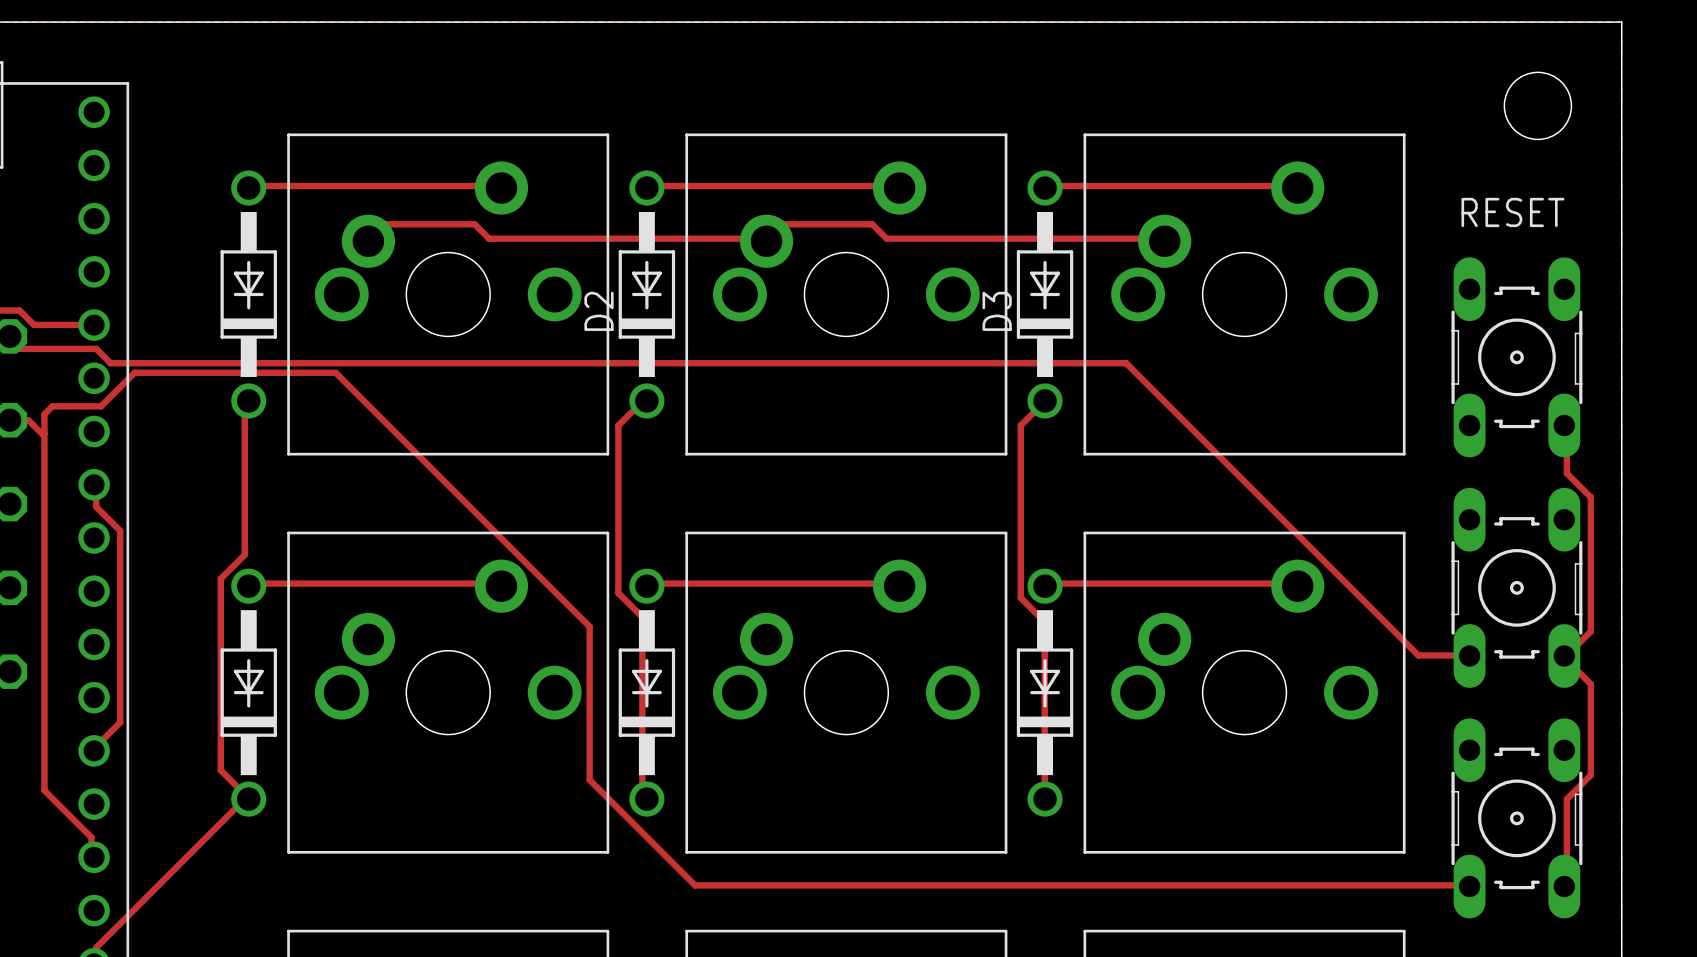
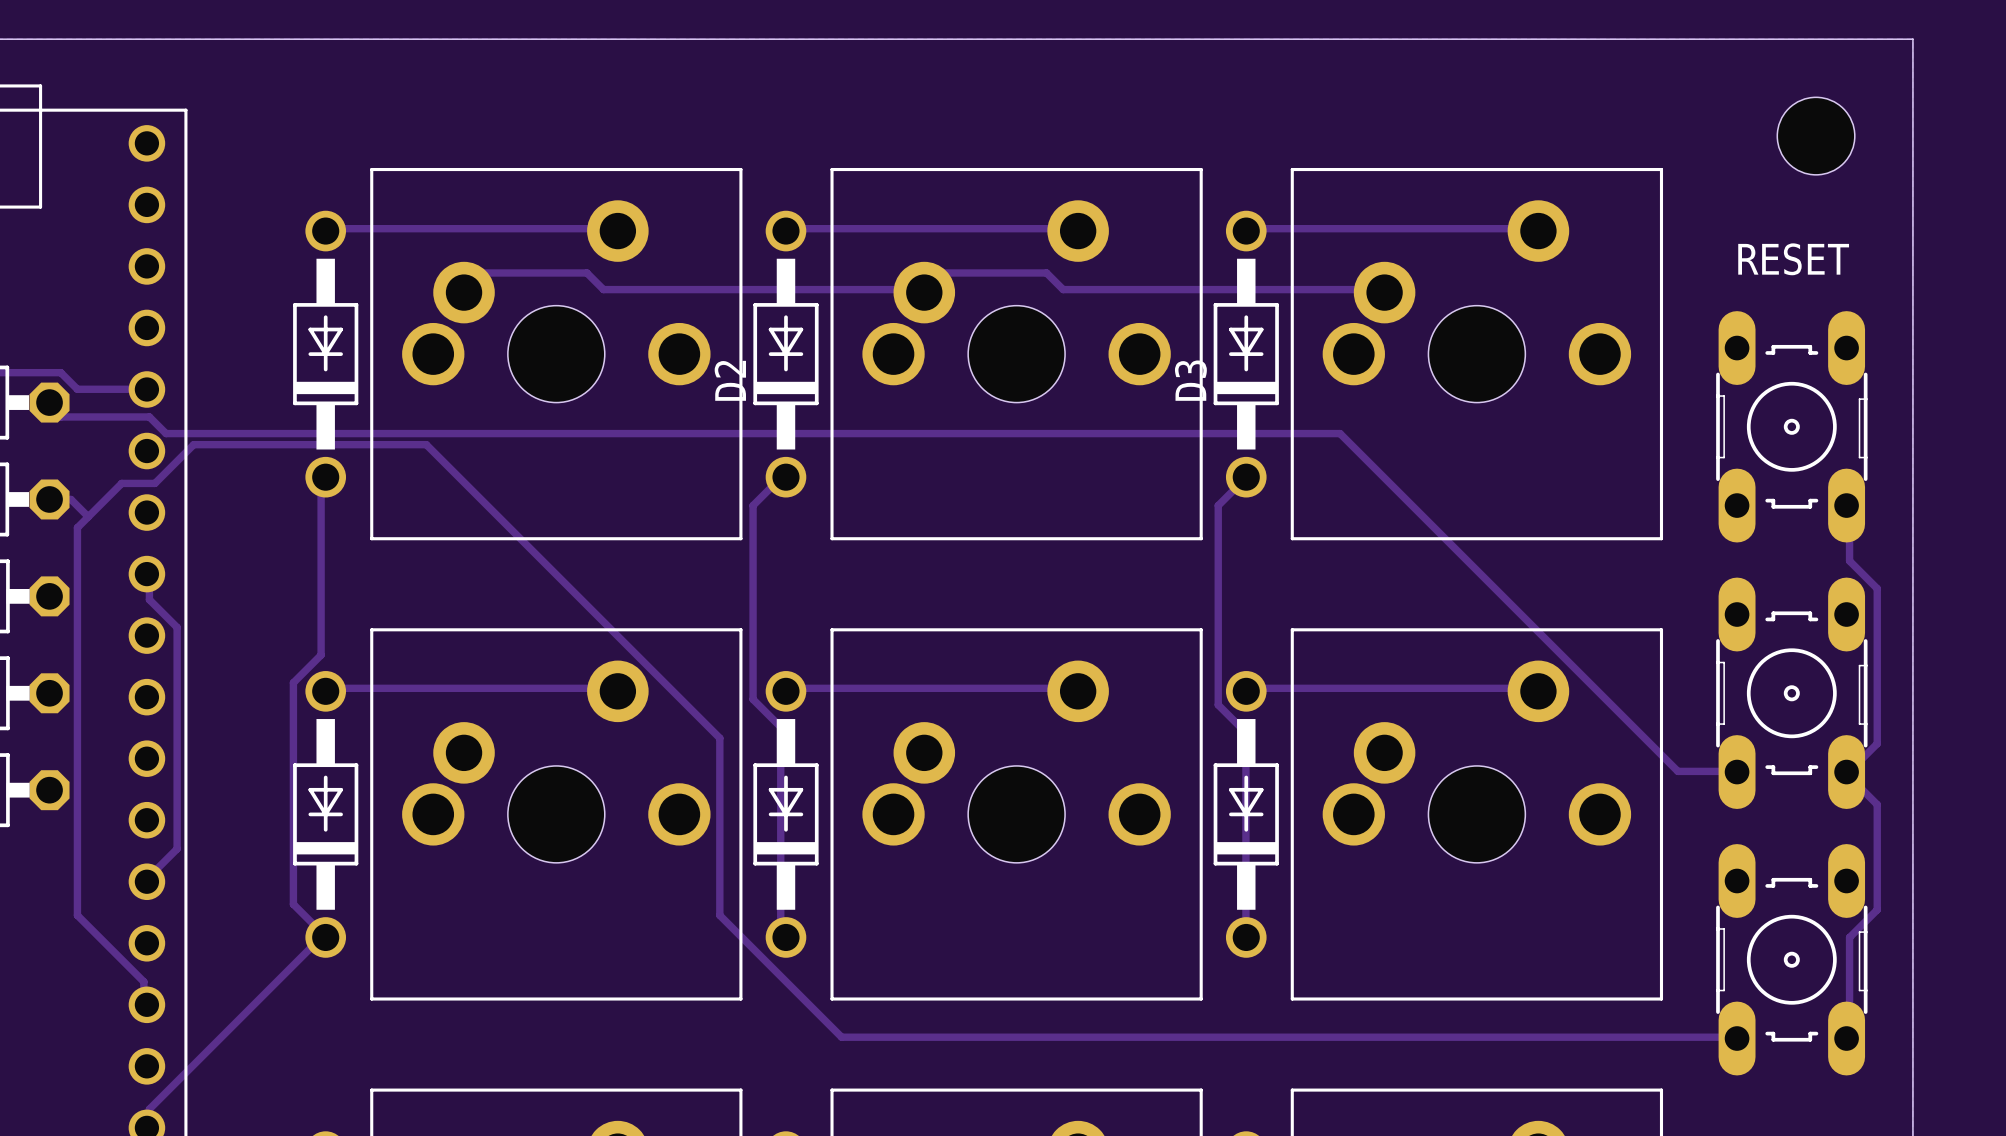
track: (72, 406) (52, 406) (44, 414) (44, 790) -> (88, 516) (77, 527) (77, 915) (89, 927)
track: none -> (121, 483) (89, 515)

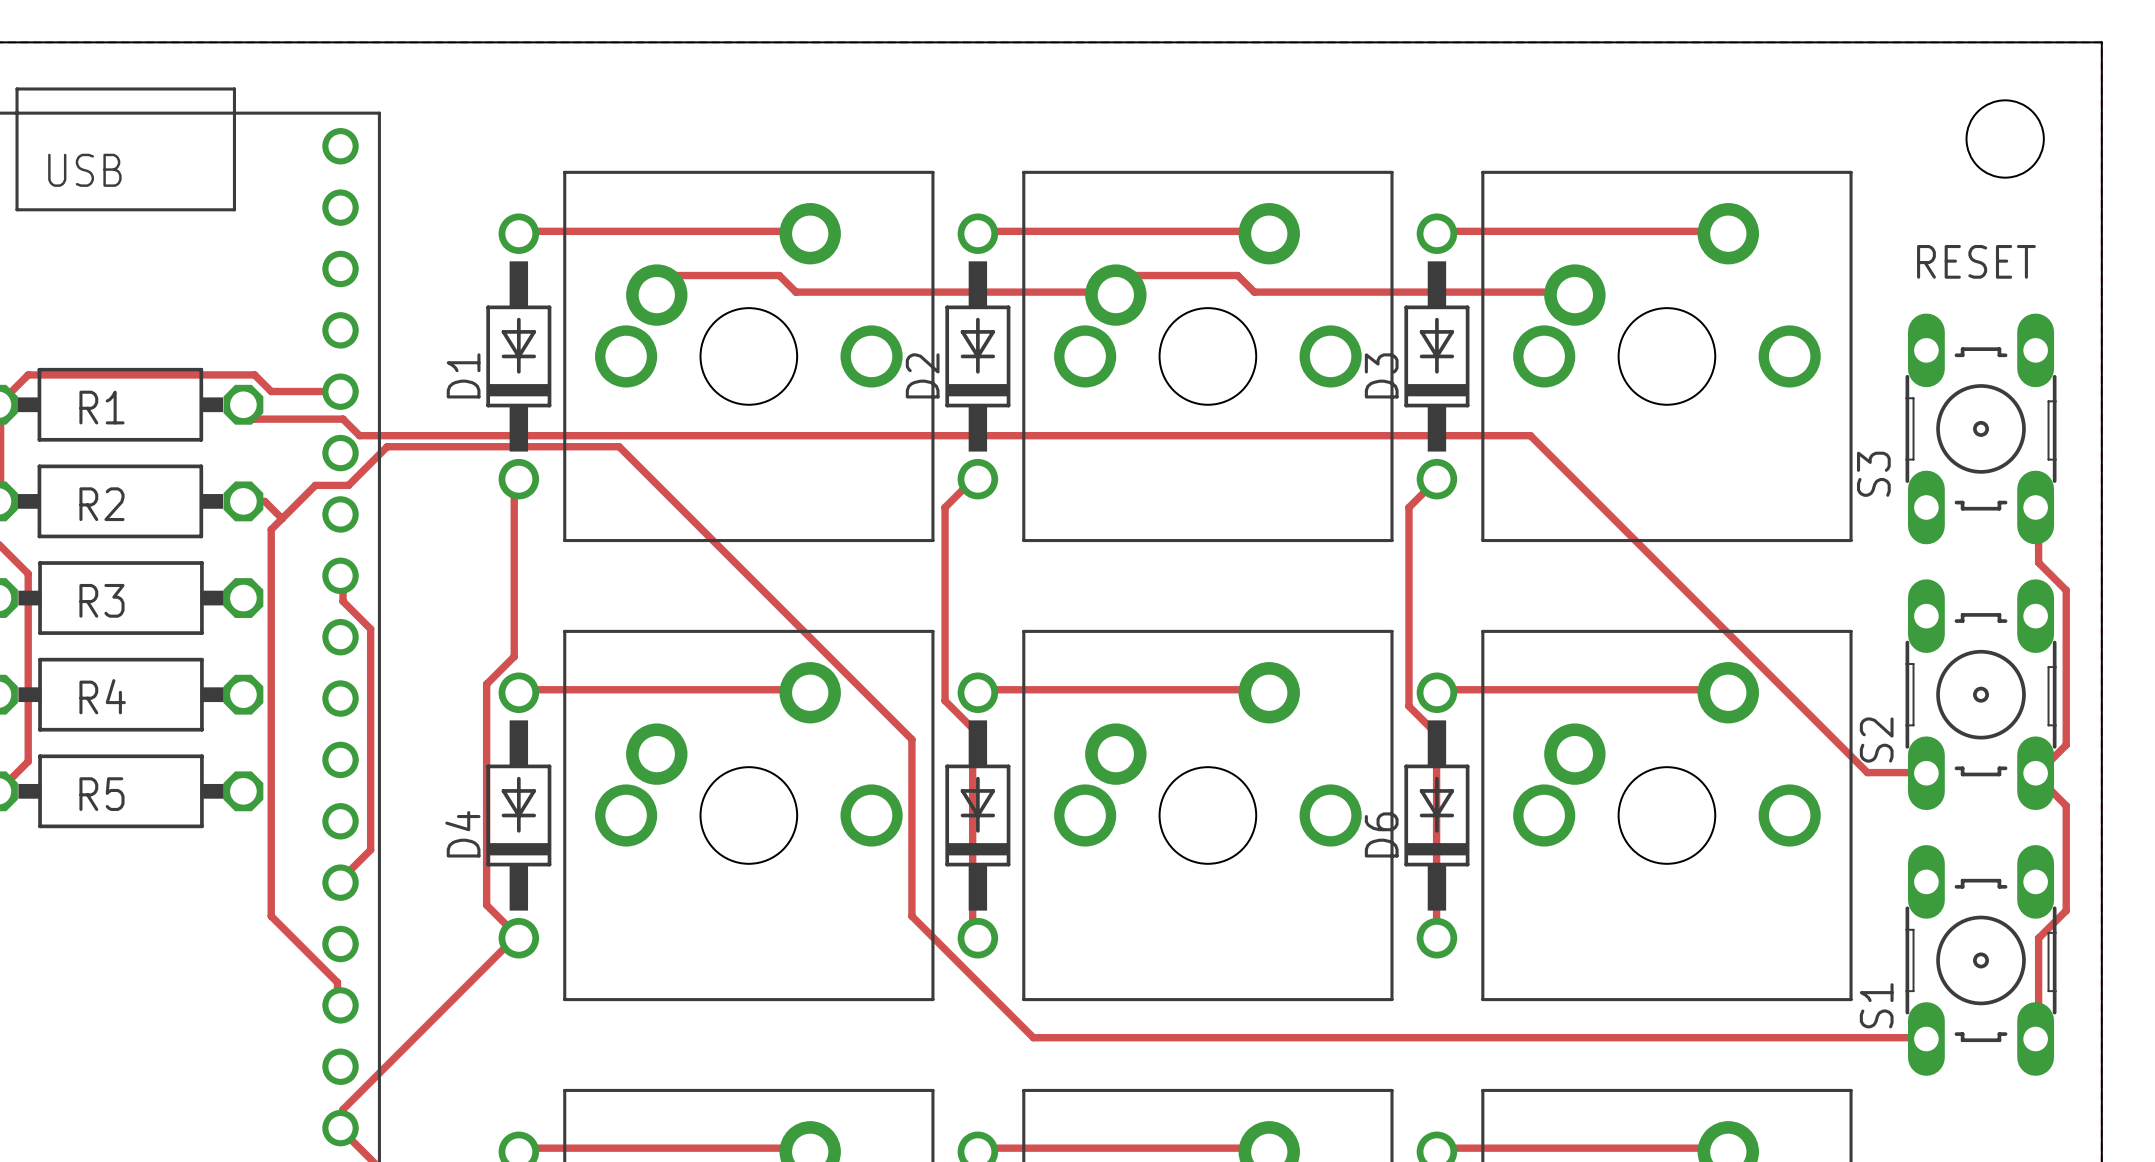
D1 name: none -> D1 (463, 375)
S3 name: none -> S3 (1873, 474)
S2 name: none -> S2 (1876, 740)
D4 name: none -> D4 (462, 834)
D6 name: none -> D6 (1381, 834)
S1 name: none -> S1 (1876, 1005)

